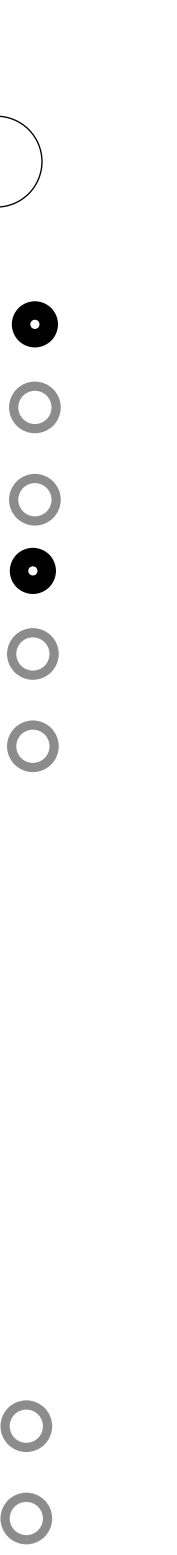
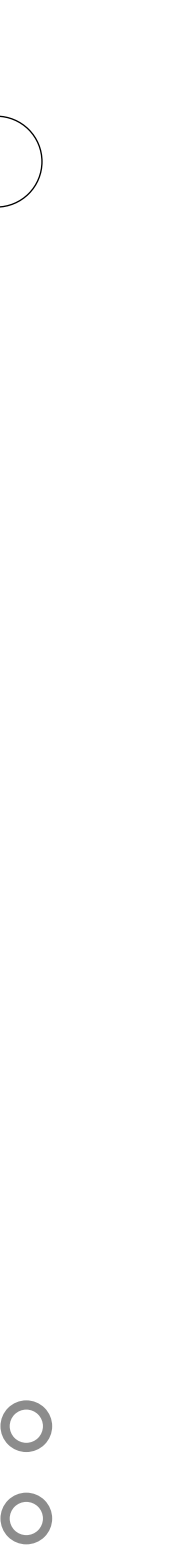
part: (34, 413) -> none
part: (32, 659) -> none

